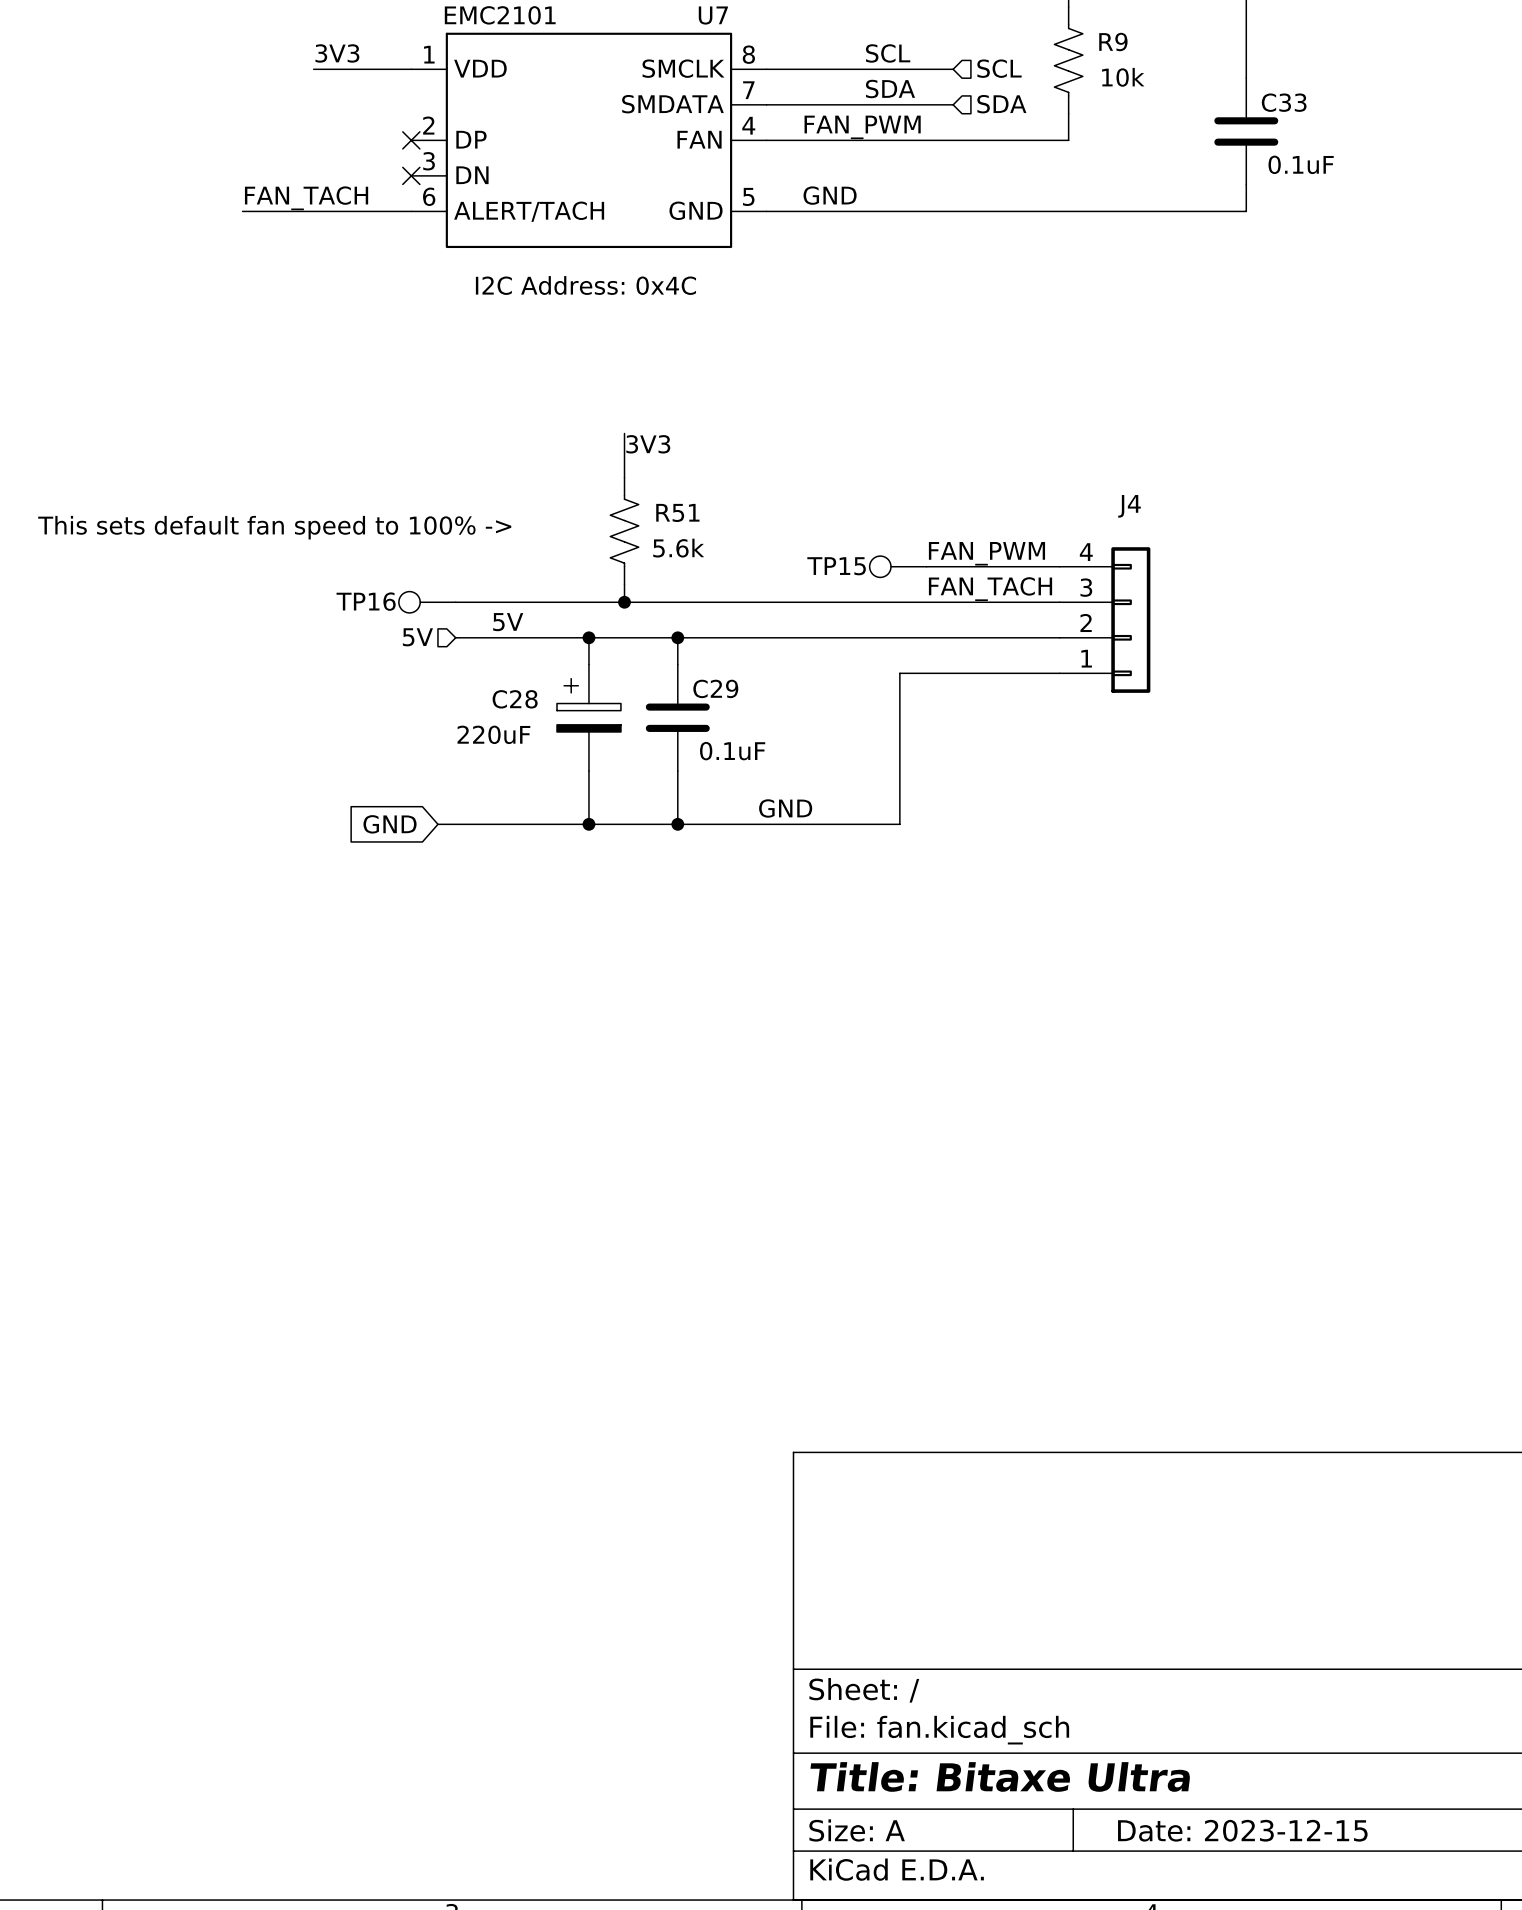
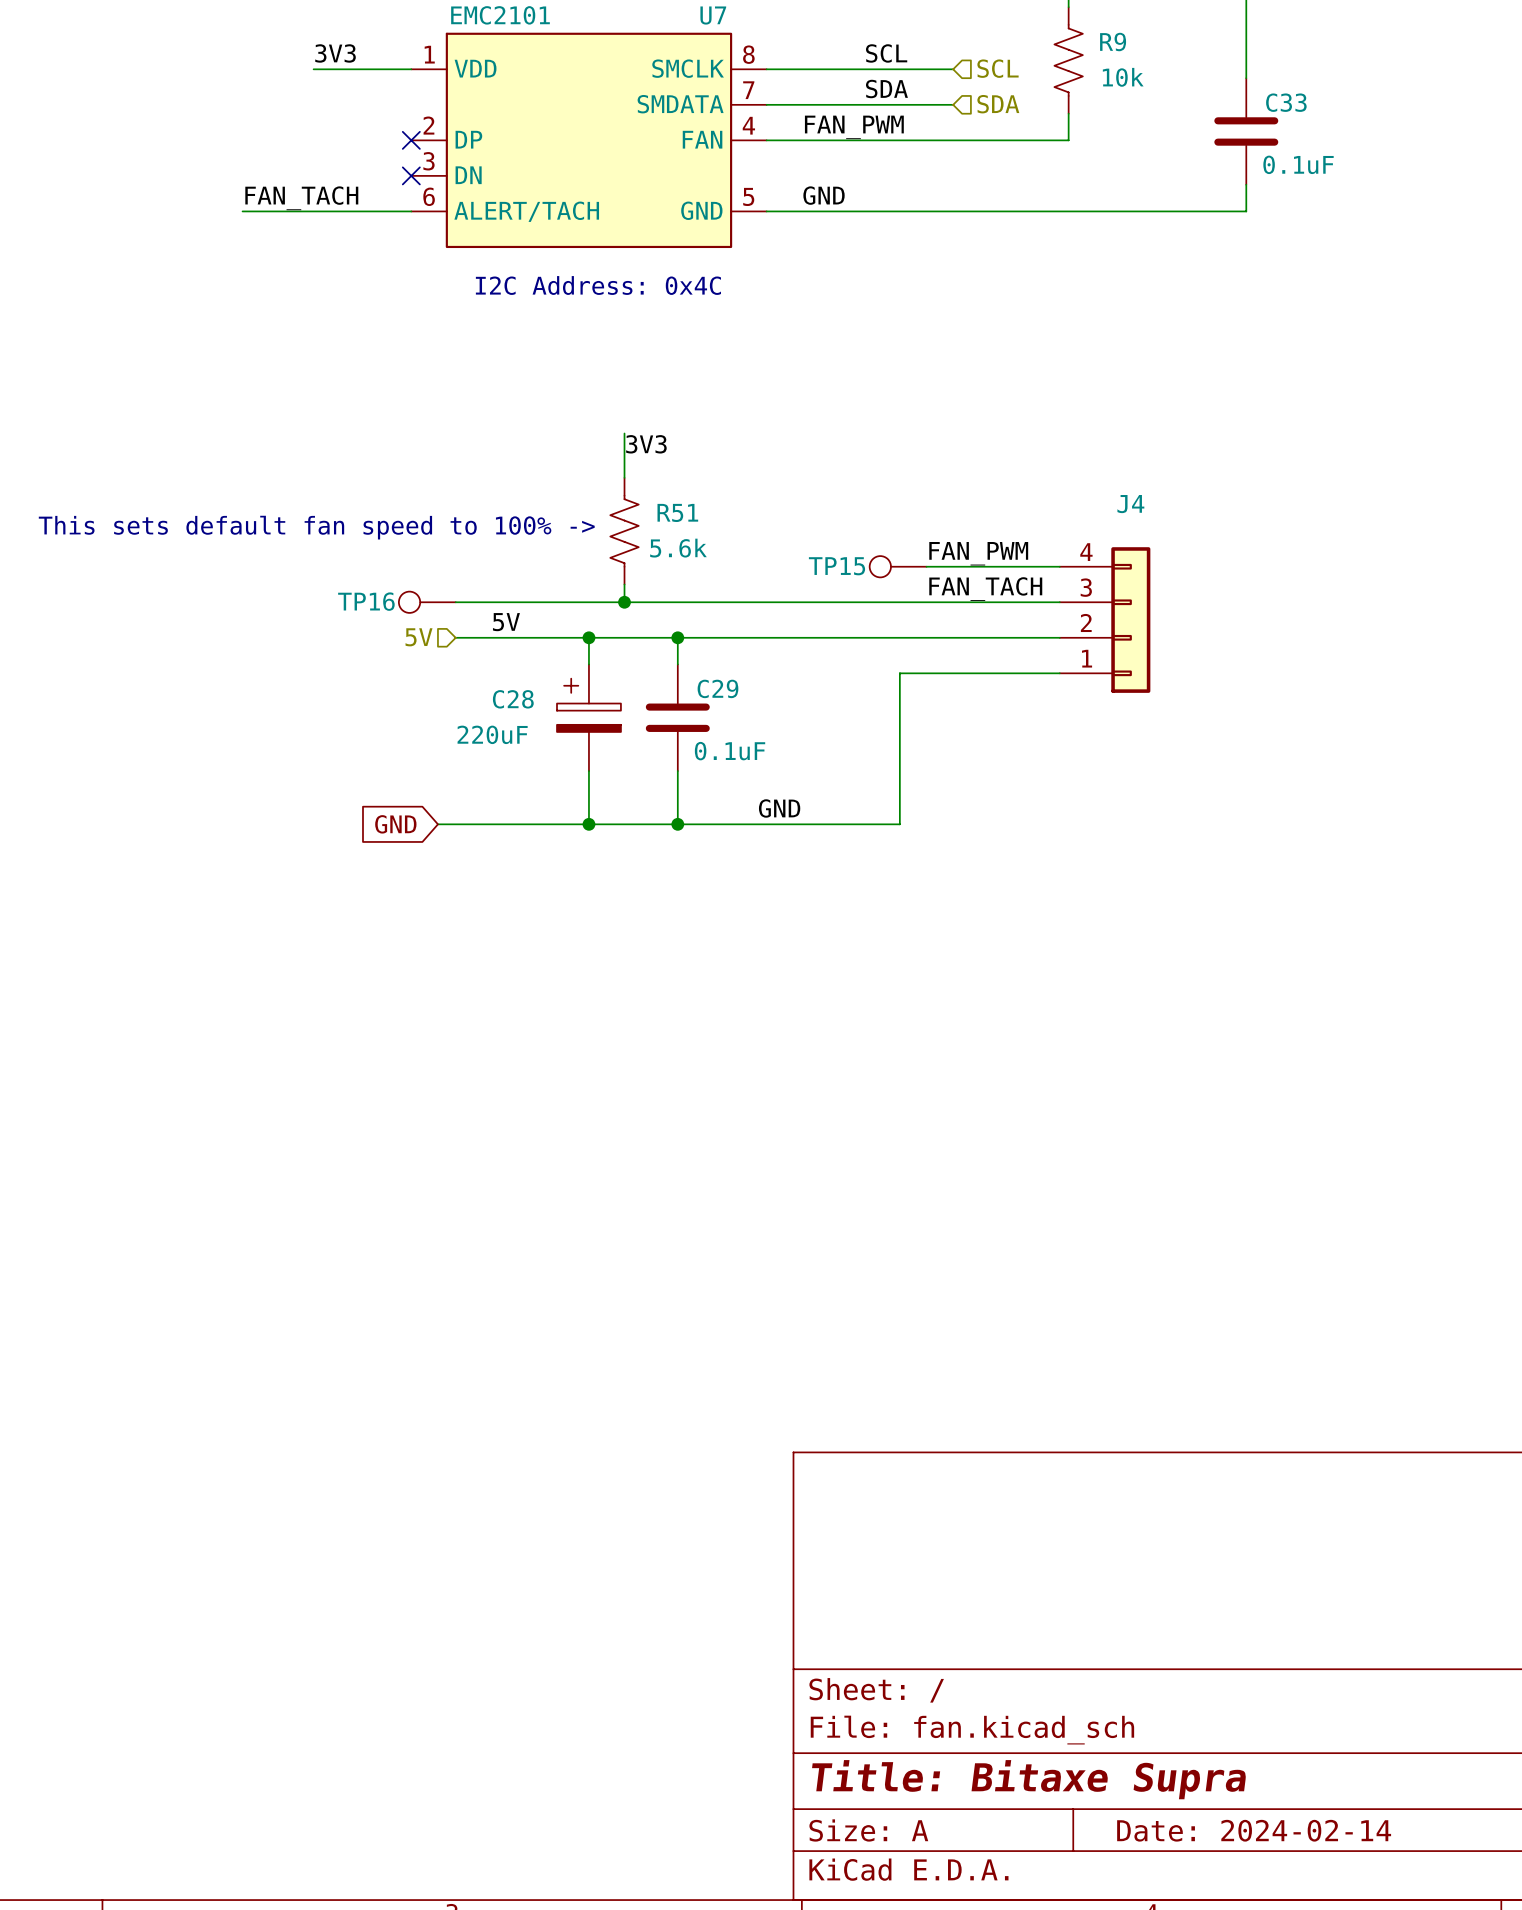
title block: Title: Bitaxe Ultra (1000, 1776) -> Title: Bitaxe Supra (1029, 1779)
title block: Date: 2023-12-15 (1242, 1830) -> Date: 2024-02-14 (1254, 1830)

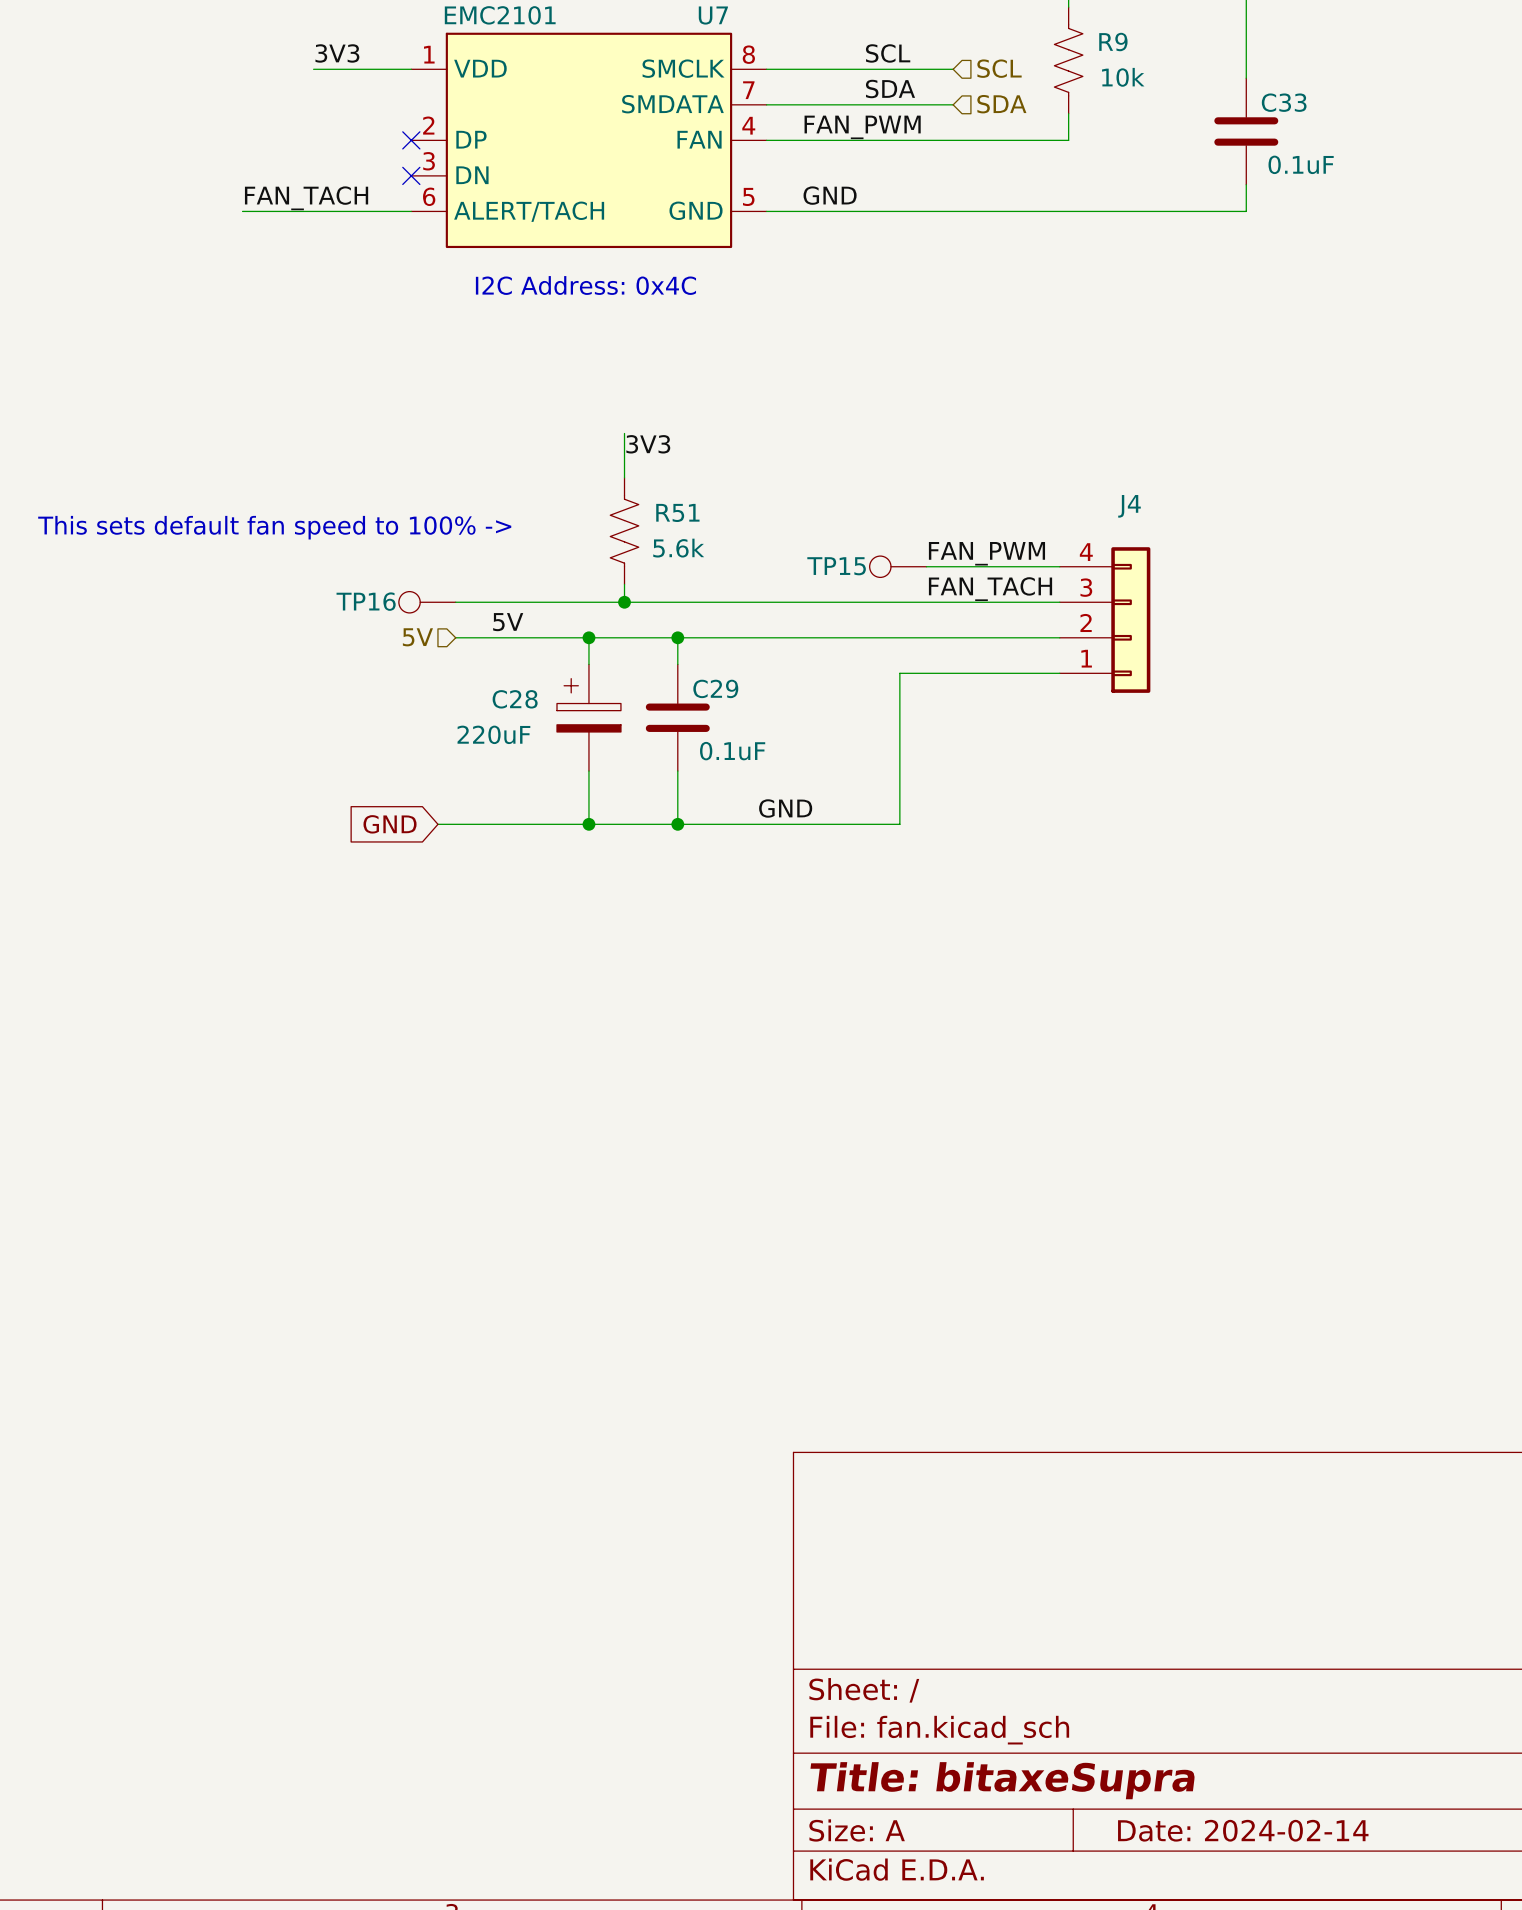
title block: Title: Bitaxe Supra (1029, 1779) -> Title: bitaxeSupra (1002, 1780)

